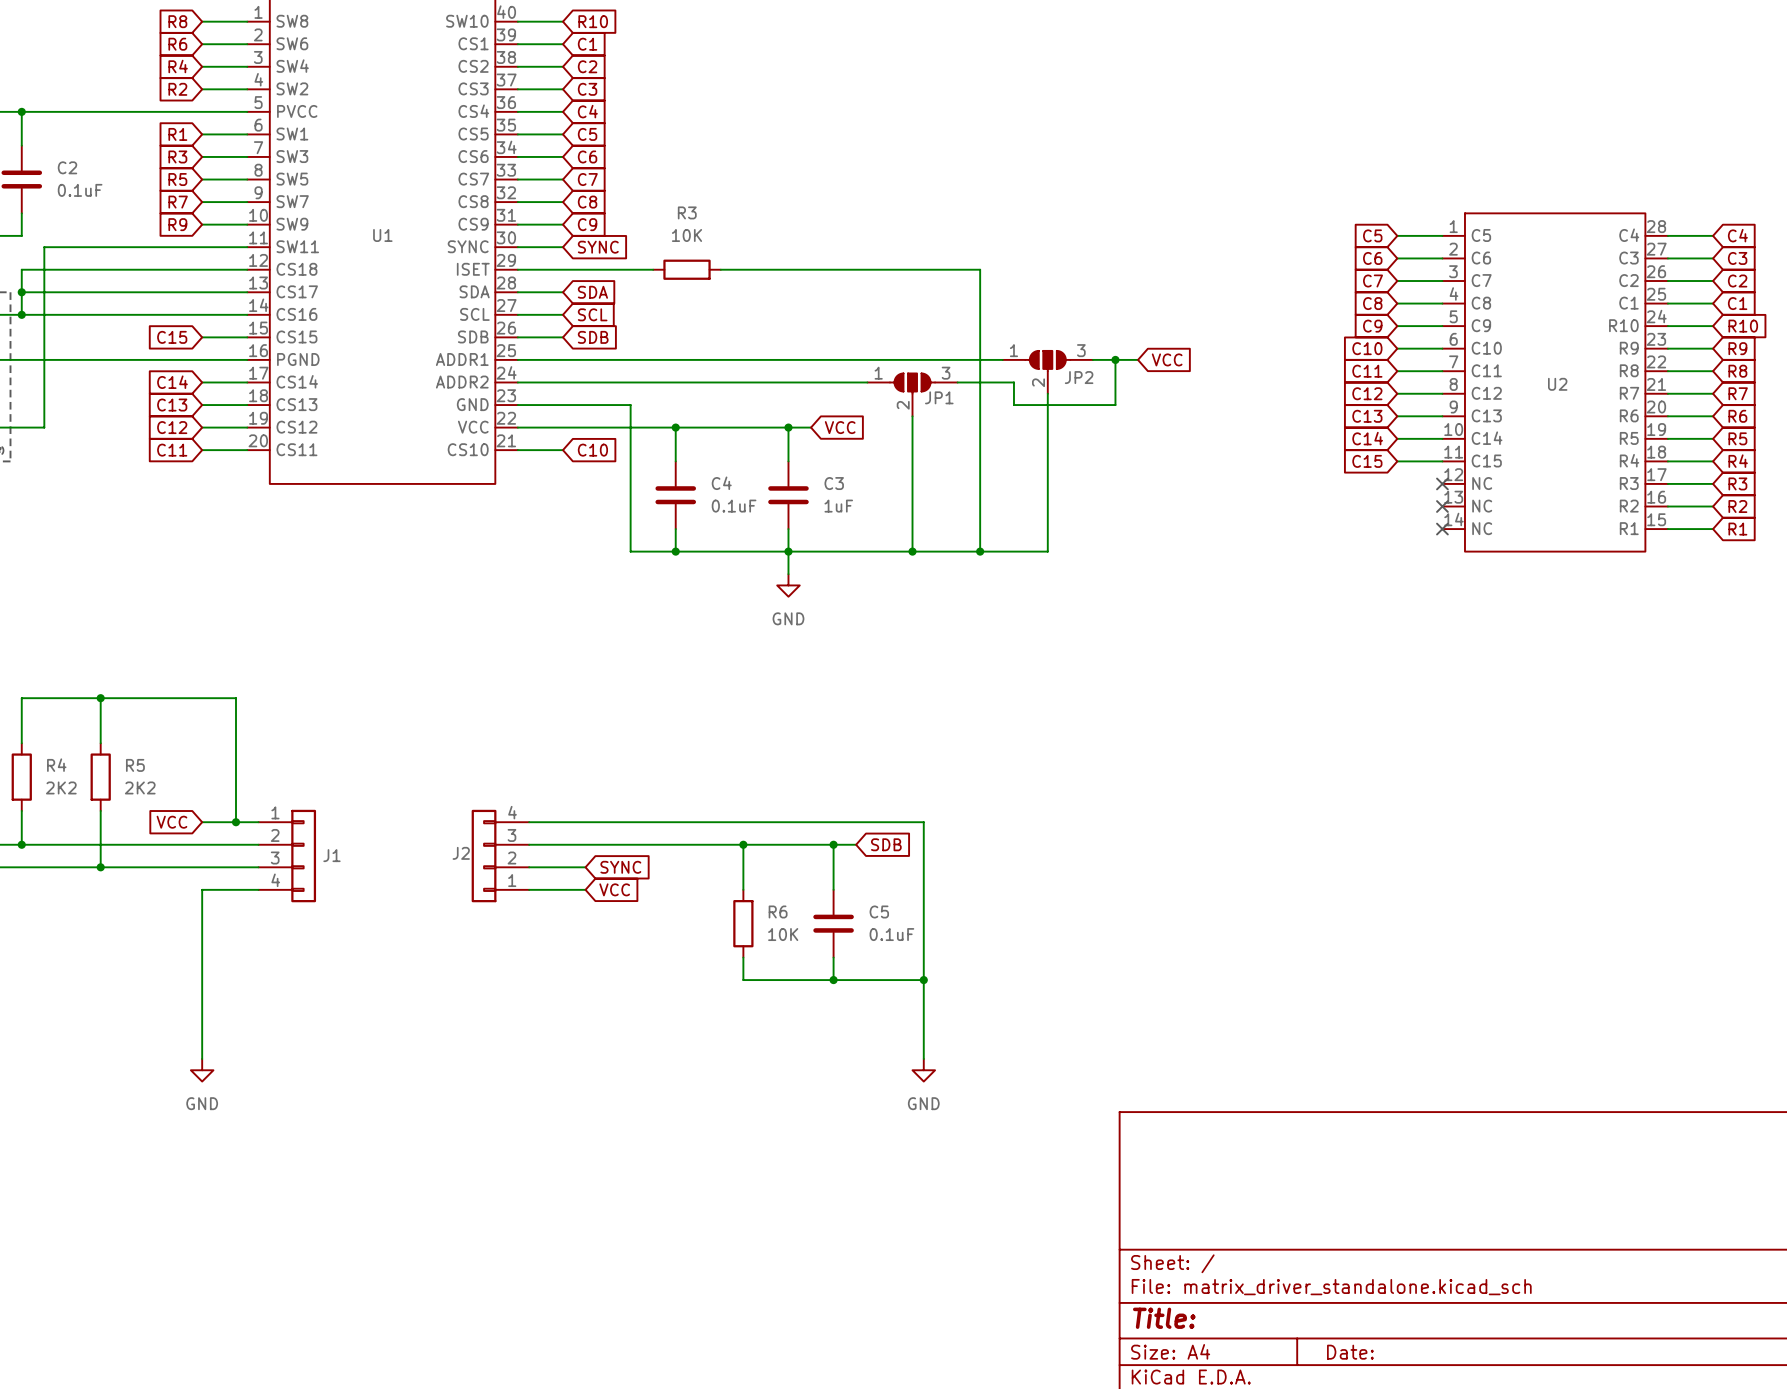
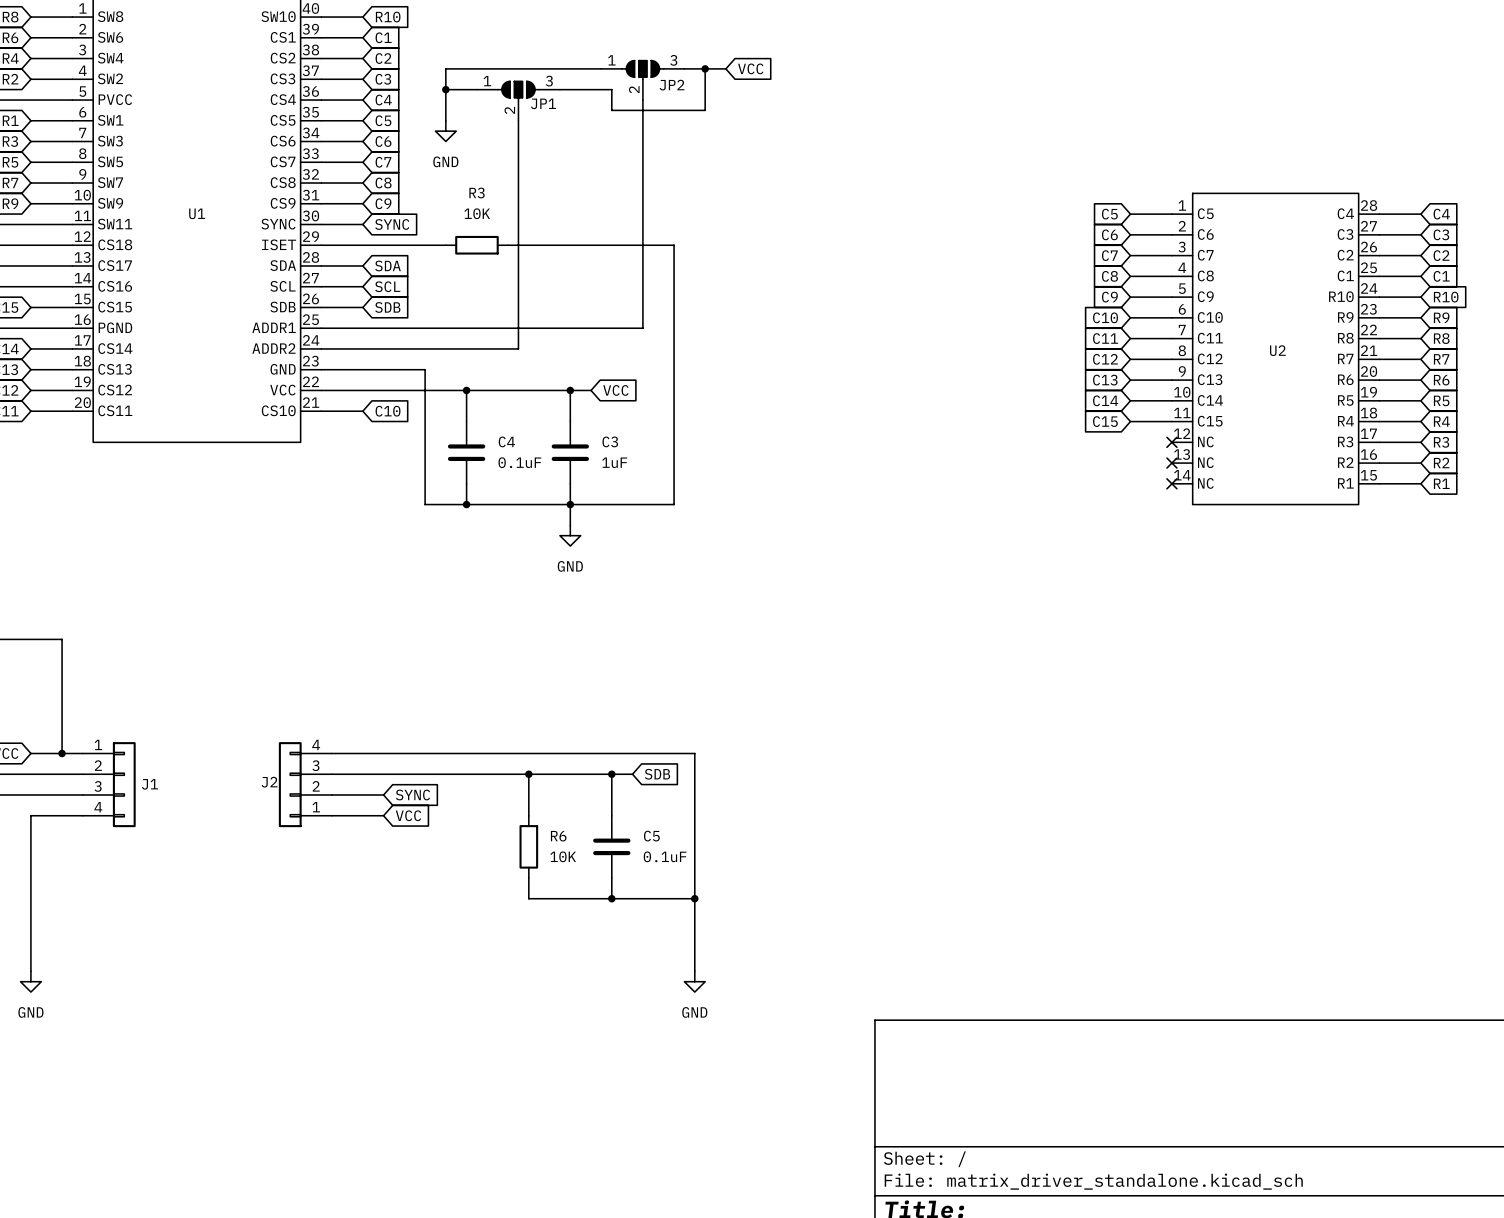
wire: none -> (601, 68) (445, 68) (445, 120)
wire: none -> (684, 68) (725, 68)
wire: none -> (705, 68) (705, 110) (611, 110) (611, 89) (559, 89)
junction: none -> (705, 68)
global label: none -> VCC (750, 68)
wire: none -> (445, 89) (476, 89)
junction: none -> (445, 89)
power symbol: none -> GND (445, 131)
wire: (901, 269) (980, 269) (980, 551) -> (674, 245) (674, 504)
wire: (867, 359) (1002, 359) -> (642, 328) (642, 100)
wire: (1092, 359) (1138, 359) -> none
wire: (1115, 359) (1115, 405) (1013, 405) (1013, 382) (957, 382) -> none
junction: (1115, 359) -> none
global label: VCC (1167, 359) -> none
JP2 position: (1047, 372) -> (642, 80)
wire: (732, 382) (867, 382) -> (518, 348) (518, 120)
wire: (1047, 393) (1047, 551) (901, 551) -> none
JP1 position: (912, 394) -> (518, 101)
wire: (912, 416) (912, 551) -> none
junction: (912, 551) -> none
junction: (980, 551) -> none

